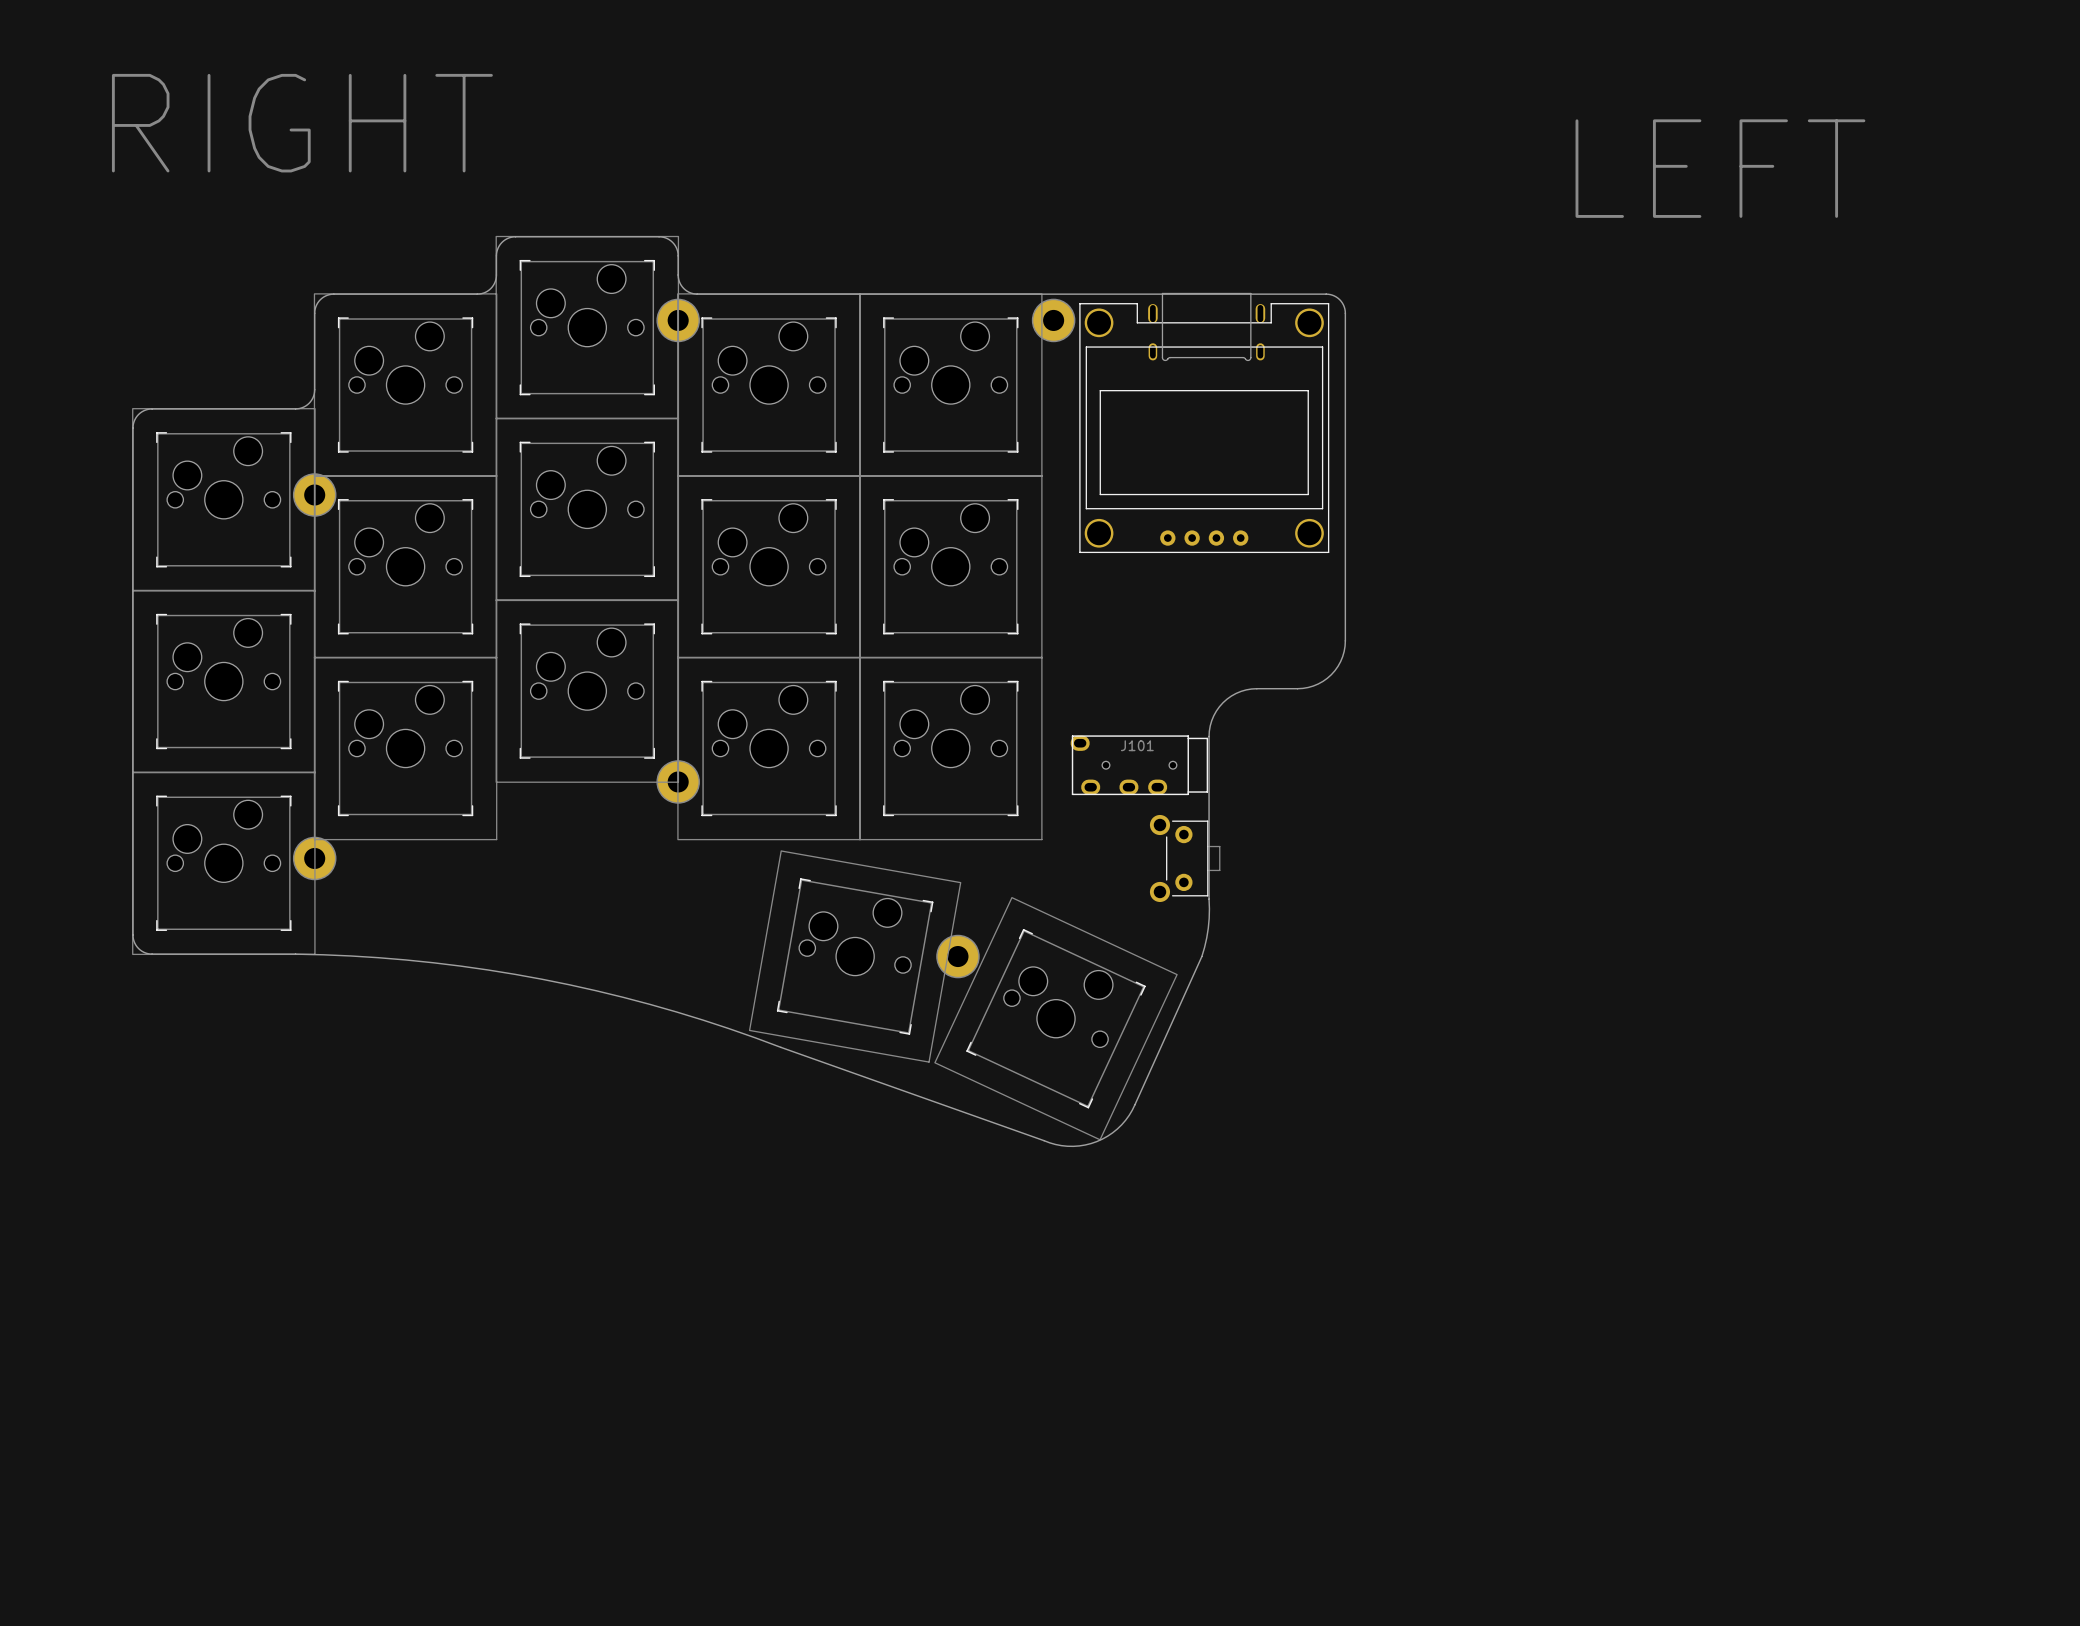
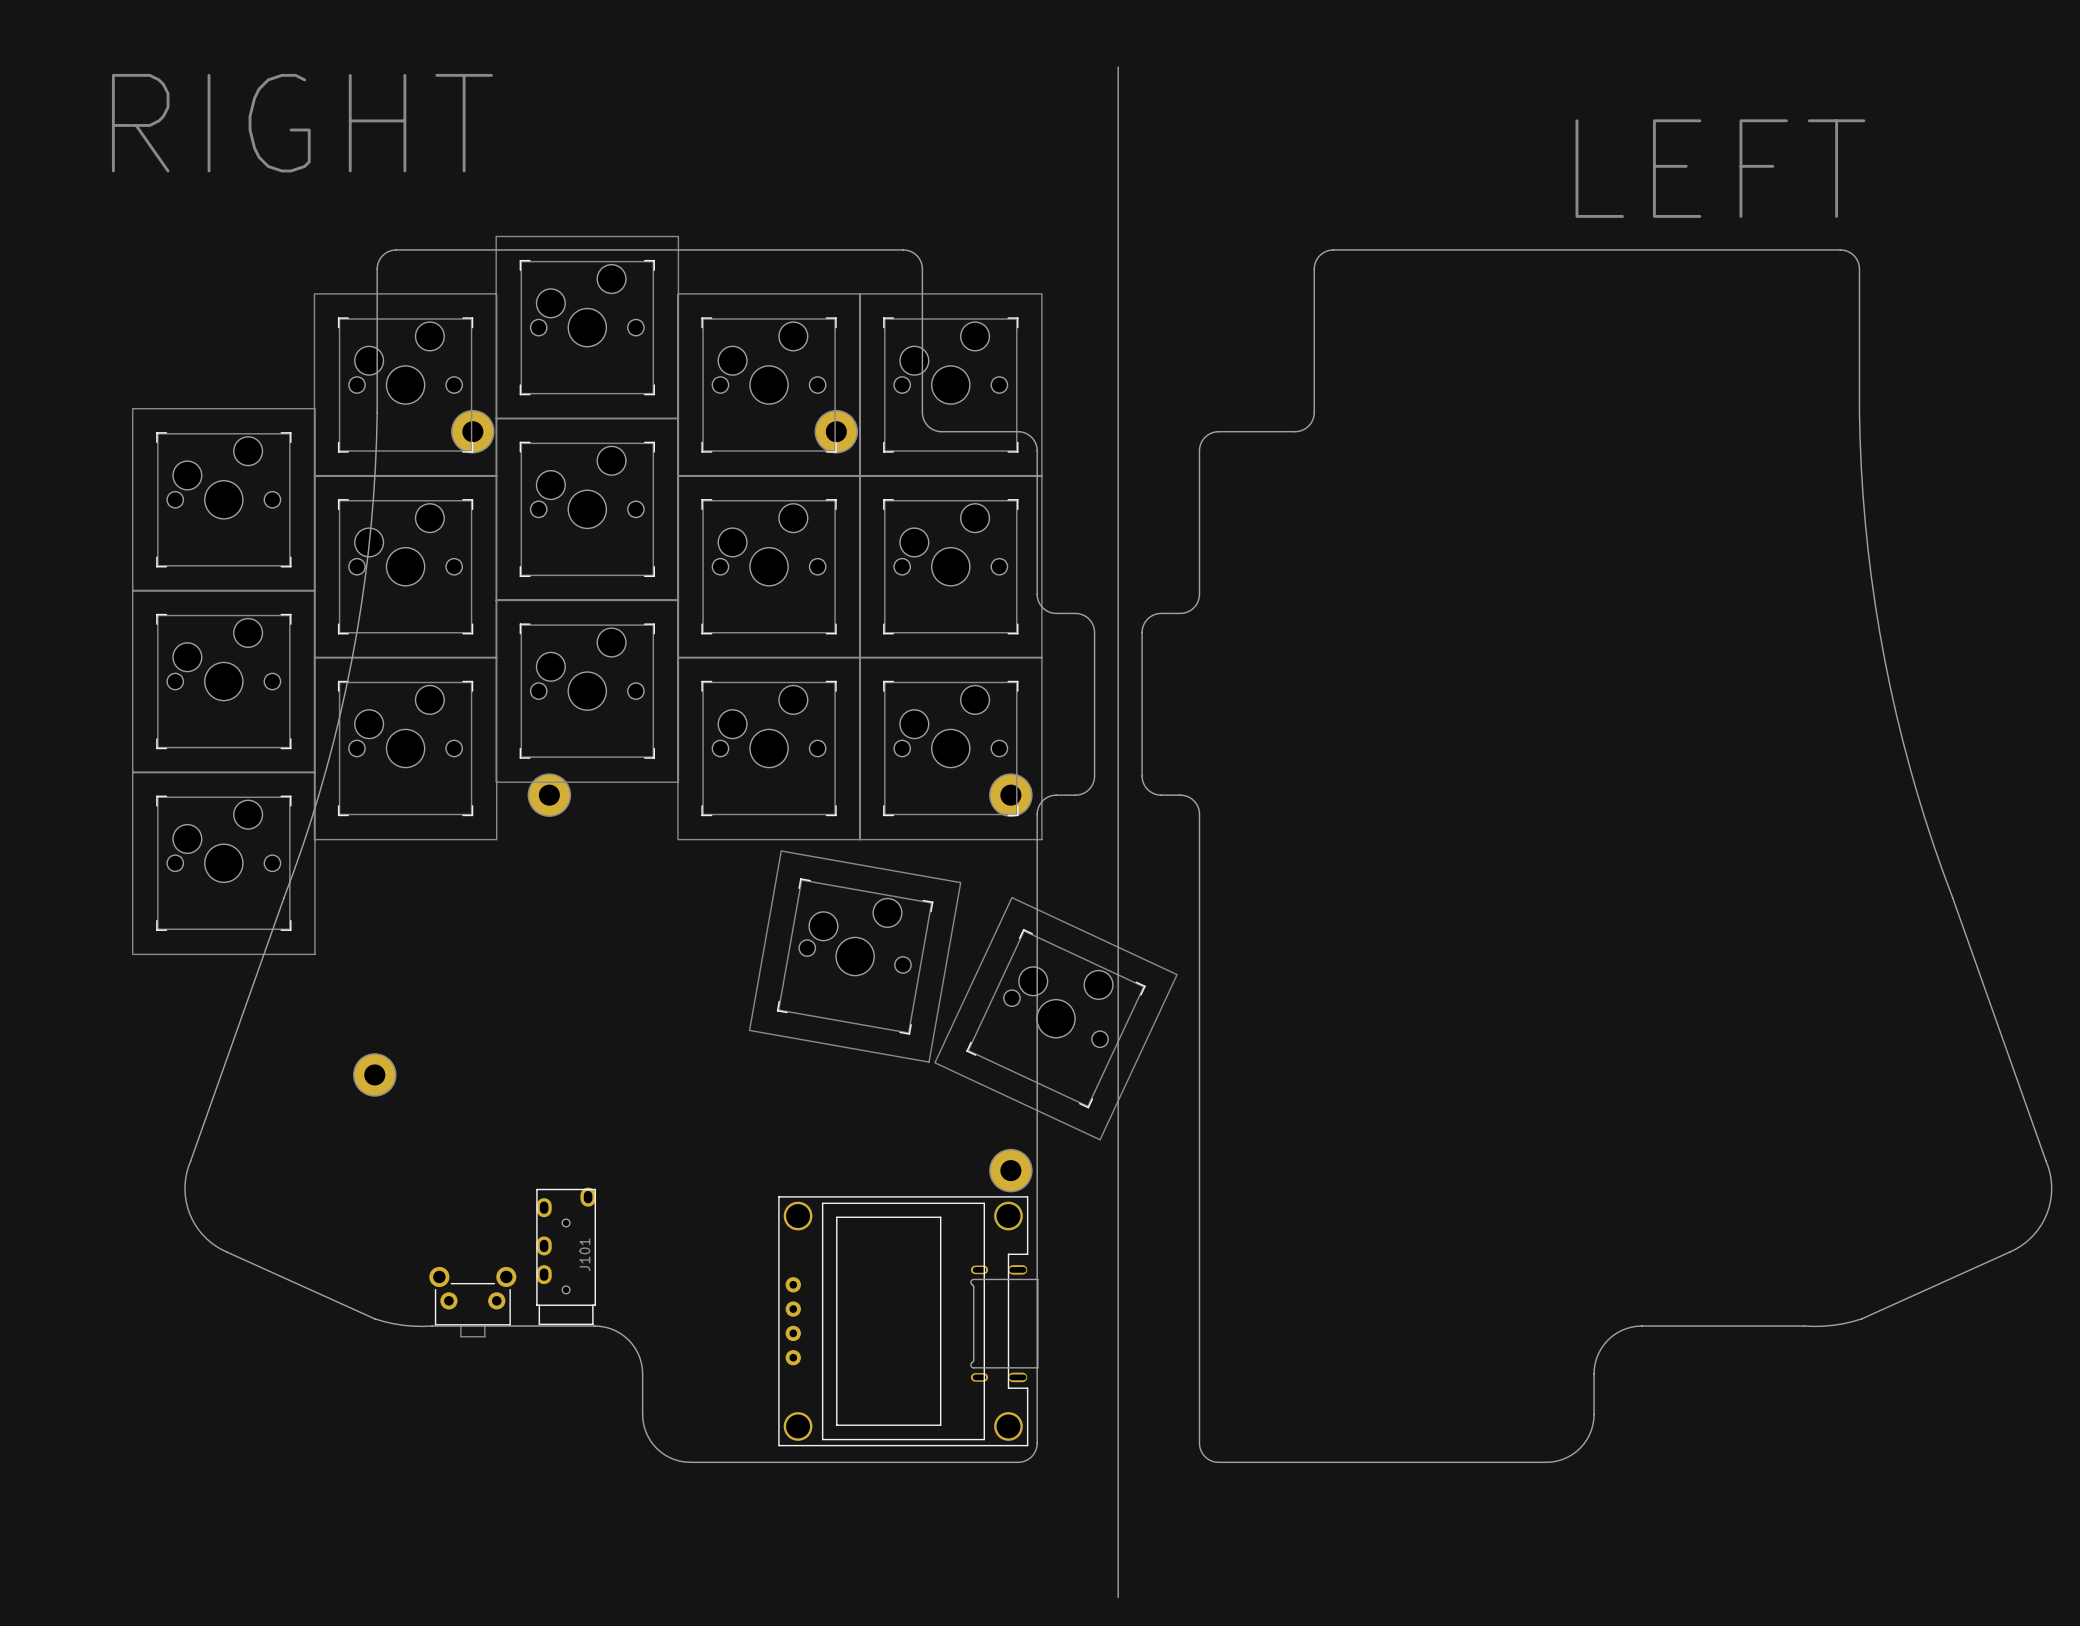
board edge: none -> (1118, 66) (1118, 1597)
board edge: (515, 236) (665, 237) (672, 242) (677, 249) (680, 283) (687, 291) (695, 294) (1326, 294) (1334, 296) (1342, 303) (1345, 313) (1344, 651) (1334, 670) (1318, 683) (1302, 688) (1256, 688) (1241, 691) (1223, 702) (1213, 715) (1209, 736) (1209, 908) (1204, 947) (1132, 1110) (1121, 1124) (1107, 1136) (1085, 1144) (1073, 1146) (1055, 1144) (702, 1020) (623, 997) (542, 979) (460, 966) (405, 959) (295, 954) (152, 954) (143, 952) (135, 945) (132, 935) (132, 428) (134, 419) (140, 413) (149, 409) (295, 408) (303, 407) (311, 399) (314, 391) (314, 311) (321, 298) (333, 294) (483, 293) (490, 288) (495, 281) (496, 253) (499, 245) (507, 238) (515, 236) -> (396, 249) (909, 251) (918, 257) (922, 266) (922, 412) (925, 422) (931, 428) (939, 431) (1022, 432) (1029, 435) (1035, 442) (1037, 450) (1038, 600) (1042, 607) (1050, 612) (1083, 615) (1090, 620) (1094, 628) (1094, 776) (1091, 786) (1085, 792) (1077, 795) (1050, 796) (1041, 802) (1037, 812) (1037, 1443) (1034, 1453) (1026, 1460) (1018, 1462) (690, 1462) (674, 1459) (656, 1448) (647, 1435) (642, 1419) (642, 1373) (639, 1358) (628, 1340) (615, 1330) (594, 1326) (422, 1326) (384, 1321) (221, 1249) (202, 1234) (192, 1219) (185, 1196) (185, 1178) (188, 1166) (302, 846) (326, 766) (346, 686) (365, 577) (373, 495) (377, 412) (377, 266) (382, 255) (396, 249)
board edge: none -> (1333, 249) (1840, 249) (1848, 251) (1855, 257) (1859, 269) (1859, 412) (1863, 495) (1875, 604) (1890, 686) (1902, 740) (1925, 819) (2050, 1178) (2051, 1196) (2046, 1213) (2038, 1229) (2025, 1242) (2010, 1251) (1861, 1318) (1823, 1326) (1636, 1326) (1616, 1333) (1601, 1348) (1595, 1363) (1593, 1419) (1589, 1435) (1576, 1451) (1556, 1461) (1218, 1462) (1206, 1458) (1199, 1447) (1199, 812) (1195, 802) (1188, 797) (1154, 794) (1147, 789) (1143, 782) (1142, 630) (1145, 622) (1152, 615) (1187, 611) (1195, 605) (1198, 599) (1199, 450) (1203, 438) (1216, 431) (1297, 431) (1304, 429) (1311, 422) (1314, 412) (1314, 266) (1321, 254) (1333, 249)
part: (678, 320) -> none
part: (1053, 320) -> none
part: (1206, 326) -> none
part: (1204, 428) -> none
part: none -> (472, 431)
part: none -> (836, 431)
part: (314, 495) -> none
J101 rotation: 0° (1139, 765) -> 90° clockwise (566, 1256)
J101 position: (1139, 765) -> (566, 1256)
part: (678, 781) -> none
part: none -> (549, 795)
part: none -> (1010, 795)
part: (314, 858) -> none
part: (1185, 858) -> none
part: (957, 956) -> none
part: none -> (374, 1074)
part: none -> (1010, 1170)
part: none -> (472, 1302)
part: none -> (903, 1321)
part: none -> (1004, 1323)

